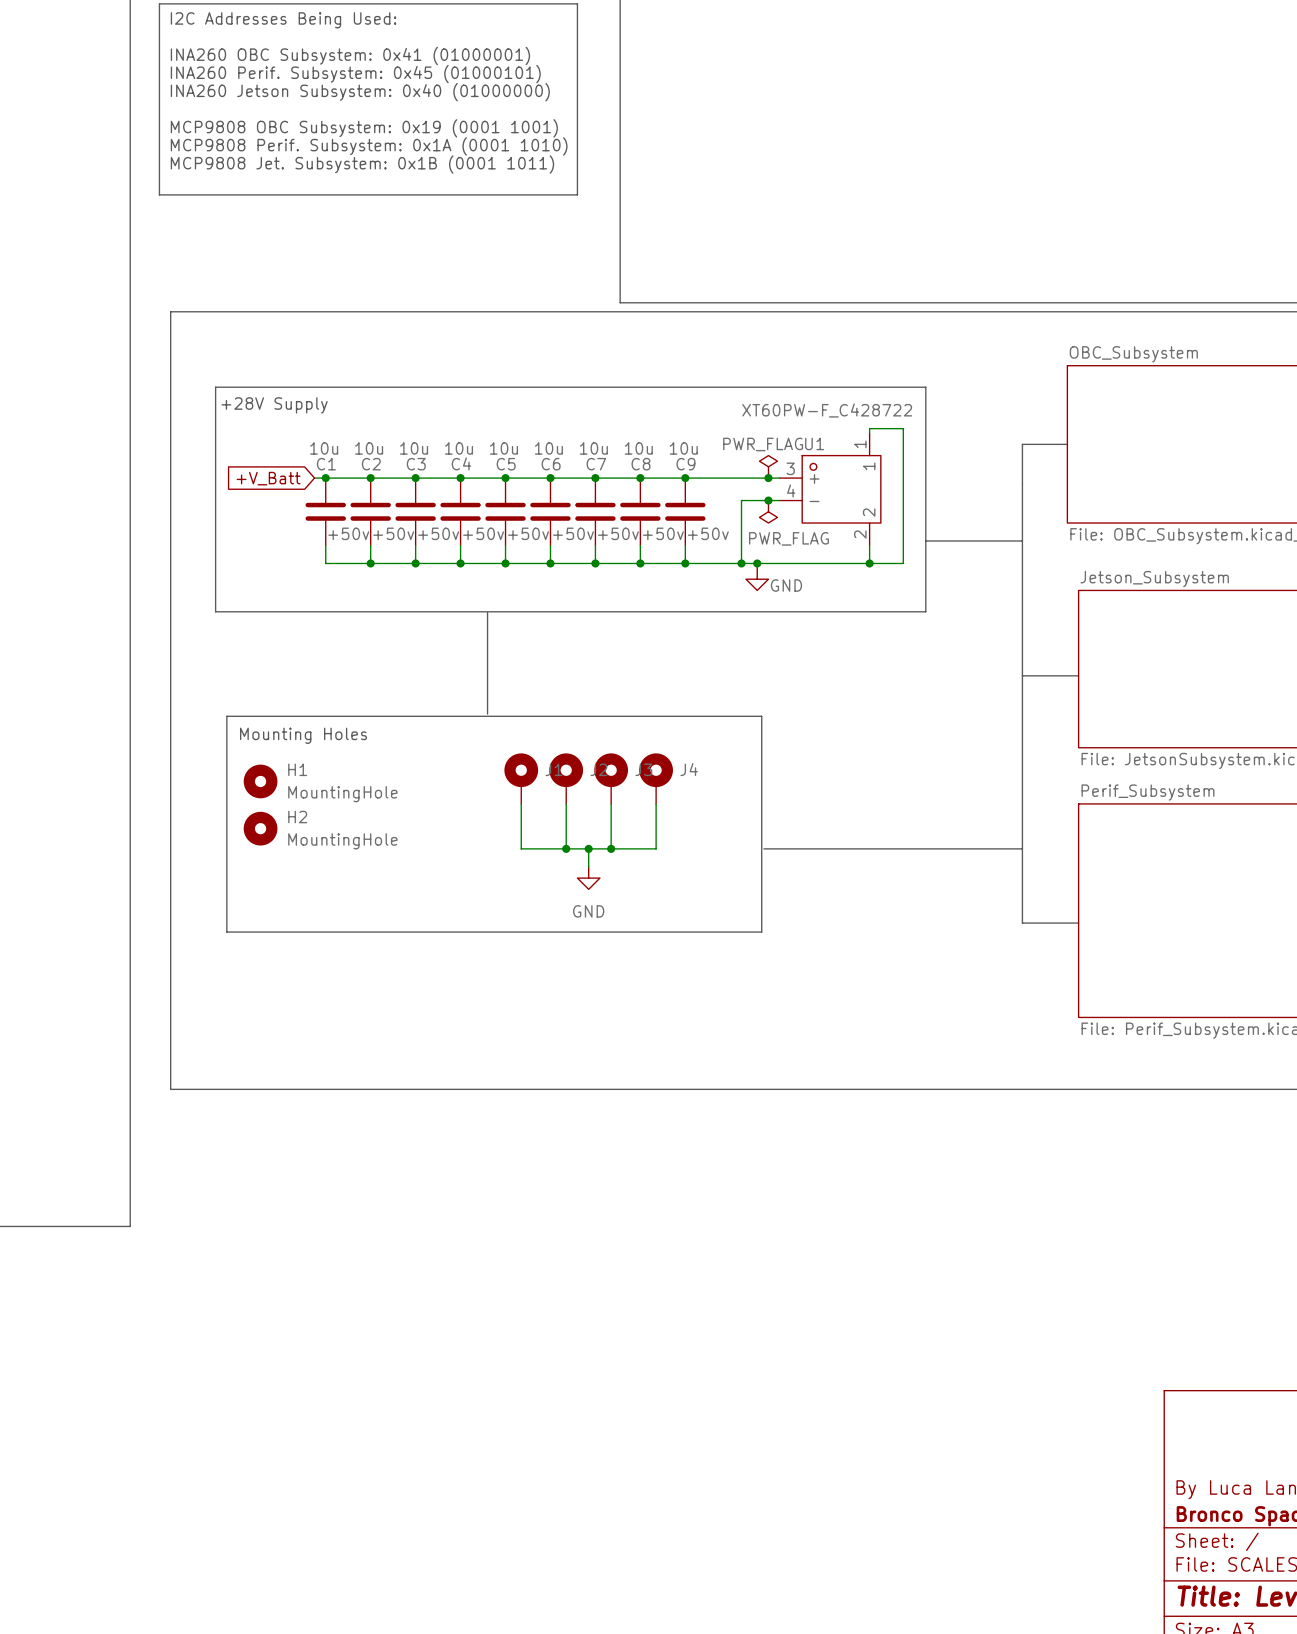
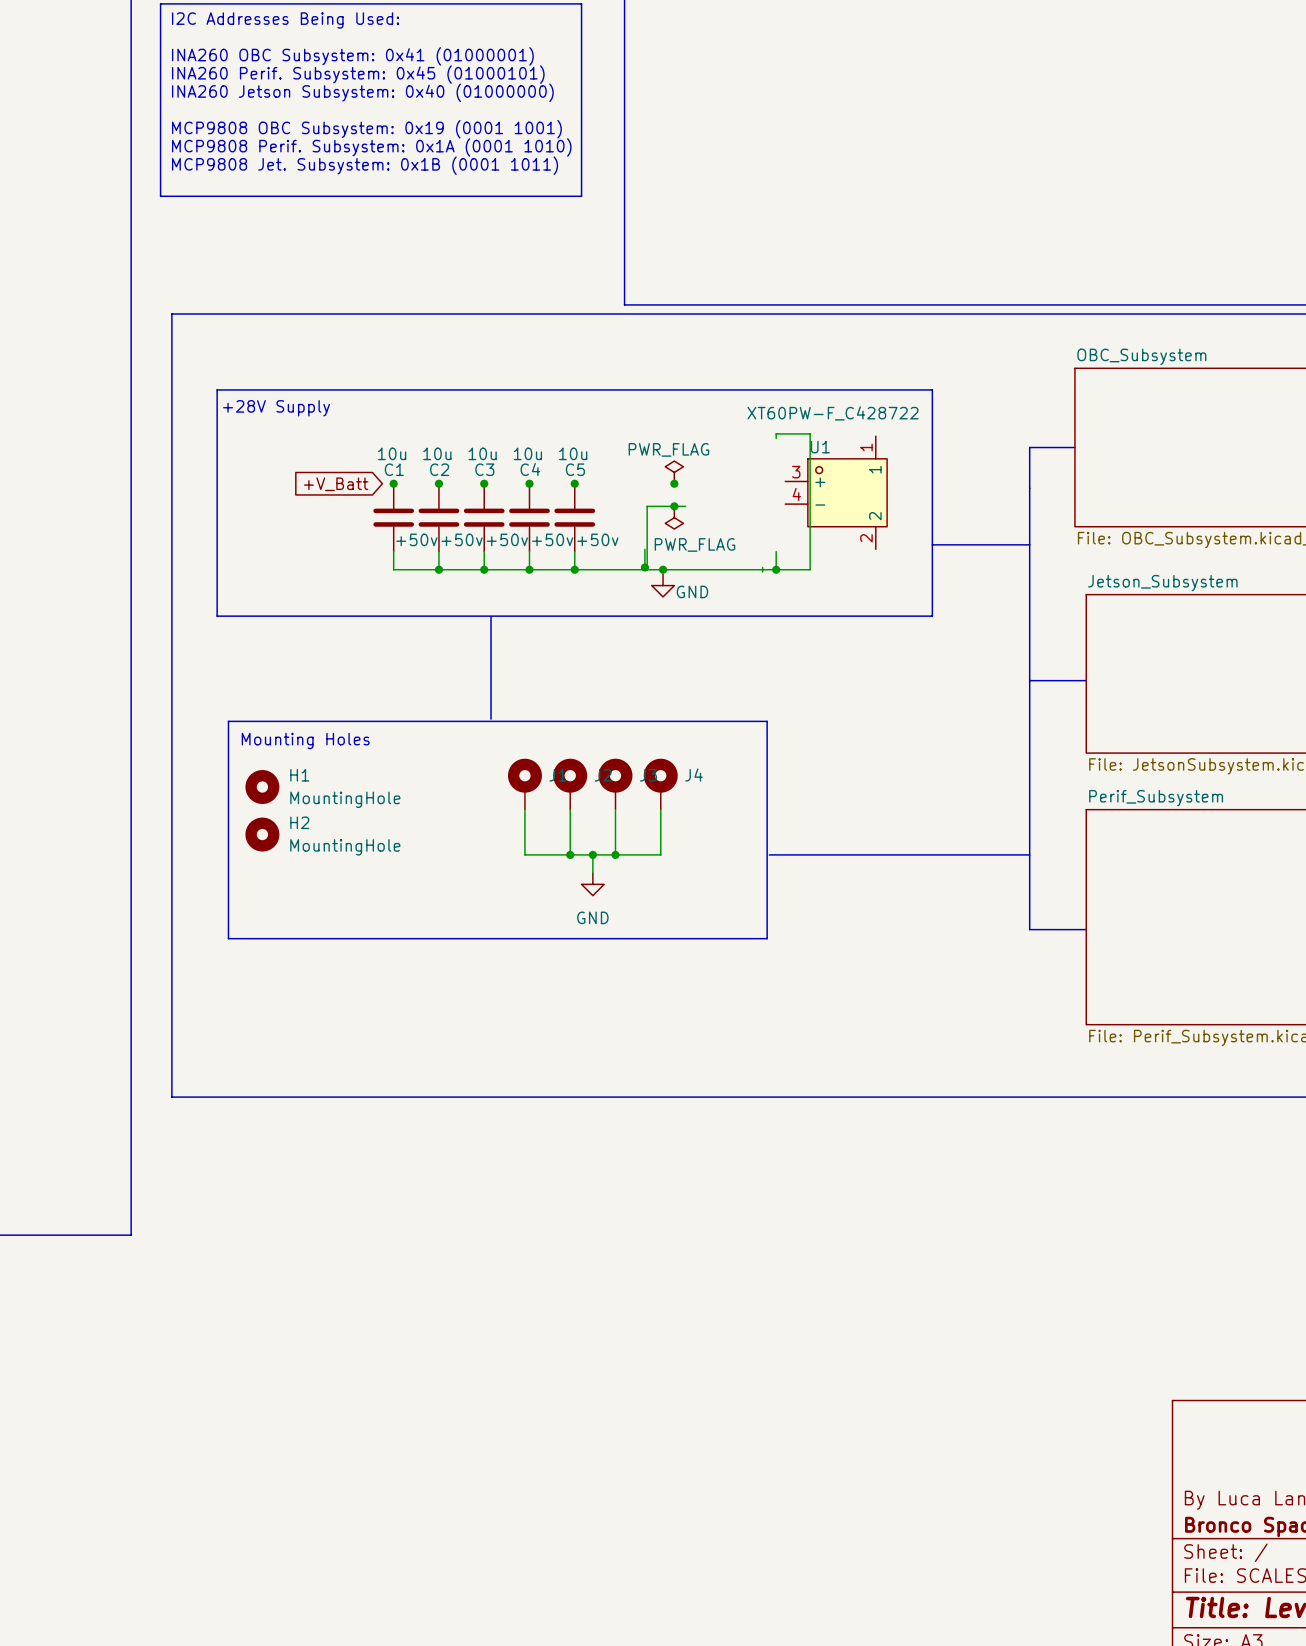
wire: (869, 433) (869, 428) (903, 428) (903, 563) (325, 563) (325, 545) -> none
wire: none -> (776, 438) (776, 433) (810, 433) (810, 569) (393, 569) (393, 551)
power symbol: PWR_FLAG (768, 466) -> none
power symbol: none -> PWR_FLAG (674, 472)
global label position: +V_Batt (268, 478) -> +V_Batt (336, 484)
wire: (314, 478) (779, 478) -> none
junction: (325, 478) -> none
junction: (370, 478) -> none
junction: (415, 478) -> none
junction: (460, 478) -> none
junction: (505, 478) -> none
junction: (550, 478) -> none
junction: (595, 478) -> none
junction: (640, 478) -> none
junction: (685, 478) -> none
junction: (768, 478) -> none
junction: none -> (393, 483)
junction: none -> (438, 483)
junction: none -> (484, 483)
junction: none -> (529, 483)
junction: none -> (574, 483)
junction: none -> (674, 483)
junction: (768, 500) -> none
wire: (779, 500) (741, 500) (741, 563) -> (685, 506) (647, 506) (647, 569)
junction: none -> (674, 506)
C1 position: (325, 511) -> (393, 517)
C2 position: (370, 511) -> (438, 517)
C3 position: (415, 511) -> (484, 517)
C4 position: (460, 511) -> (529, 517)
C5 position: (505, 511) -> (574, 517)
C6: 10u (550, 511) -> none
C7: 10u (595, 511) -> none
C8: 10u (640, 511) -> none
C9: 10u (685, 511) -> none
power symbol: PWR_FLAG (768, 511) -> none
power symbol: none -> PWR_FLAG (674, 517)
wire: (370, 545) (370, 563) -> none
wire: (415, 545) (415, 563) -> (438, 551) (438, 569)
wire: (460, 545) (460, 563) -> (484, 551) (484, 569)
wire: (505, 545) (505, 563) -> (529, 551) (529, 569)
wire: (550, 545) (550, 563) -> (574, 551) (574, 569)
wire: (595, 545) (595, 563) -> none
wire: (685, 545) (685, 563) -> none
wire: (869, 545) (869, 563) -> (776, 551) (776, 569)
junction: (370, 563) -> none
junction: (415, 563) -> none
junction: (460, 563) -> none
junction: (505, 563) -> none
junction: (550, 563) -> none
junction: (595, 563) -> none
junction position: (685, 563) -> (663, 569)
junction: (741, 563) -> none
junction position: (757, 563) -> (776, 569)
junction: (869, 563) -> none
junction: none -> (438, 569)
junction: none -> (484, 569)
junction: none -> (529, 569)
junction: none -> (574, 569)
power symbol position: GND (757, 579) -> GND (663, 585)

